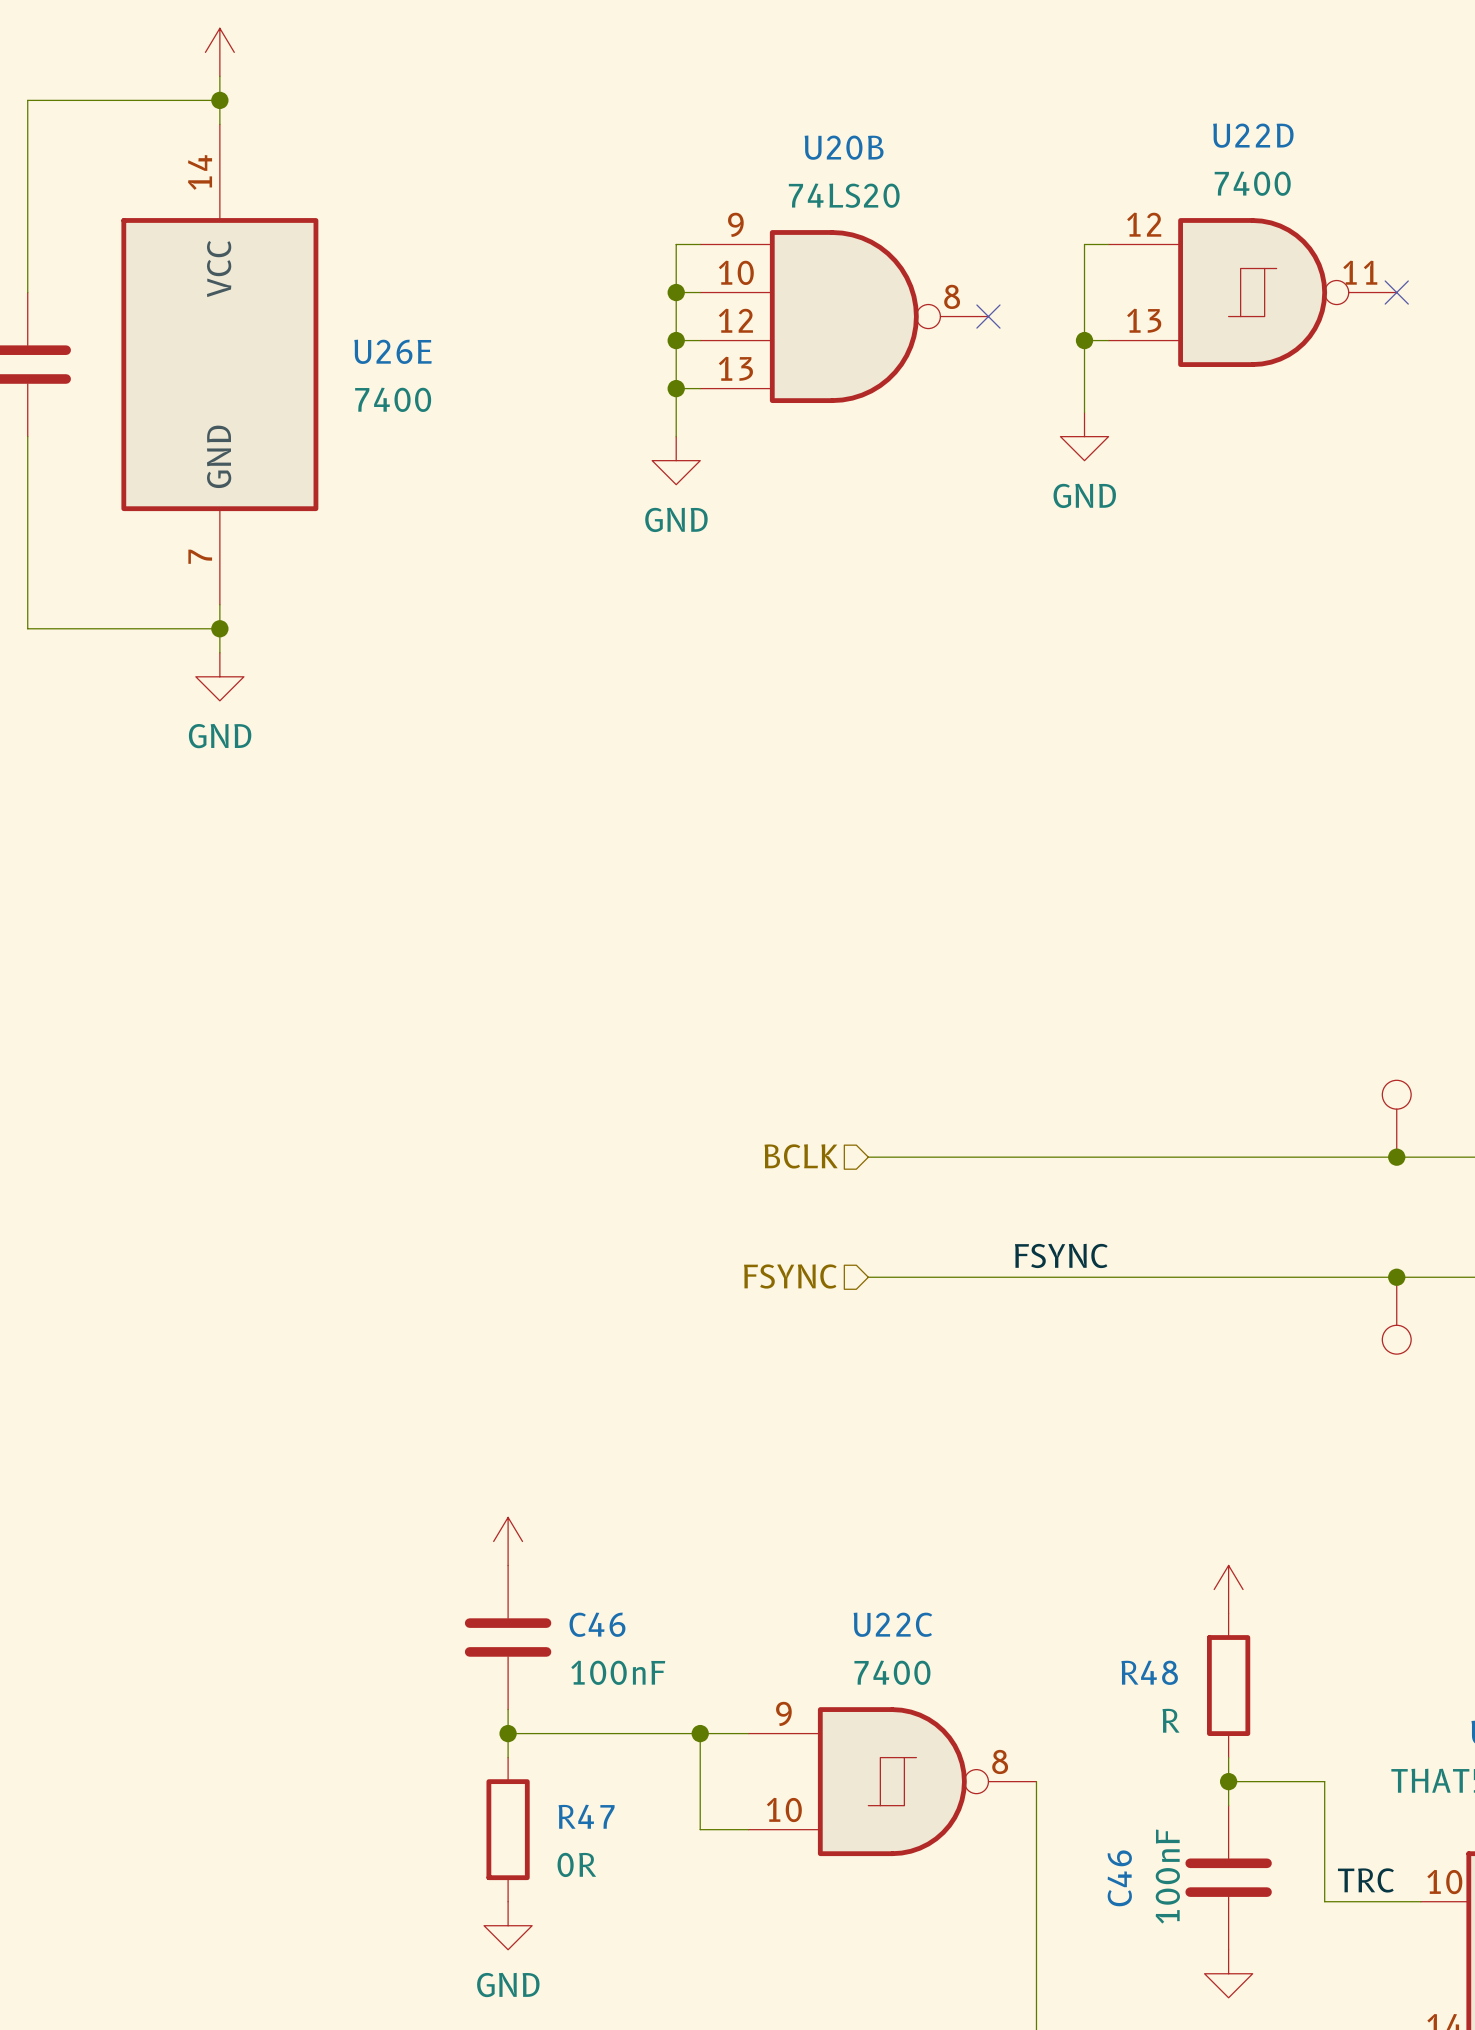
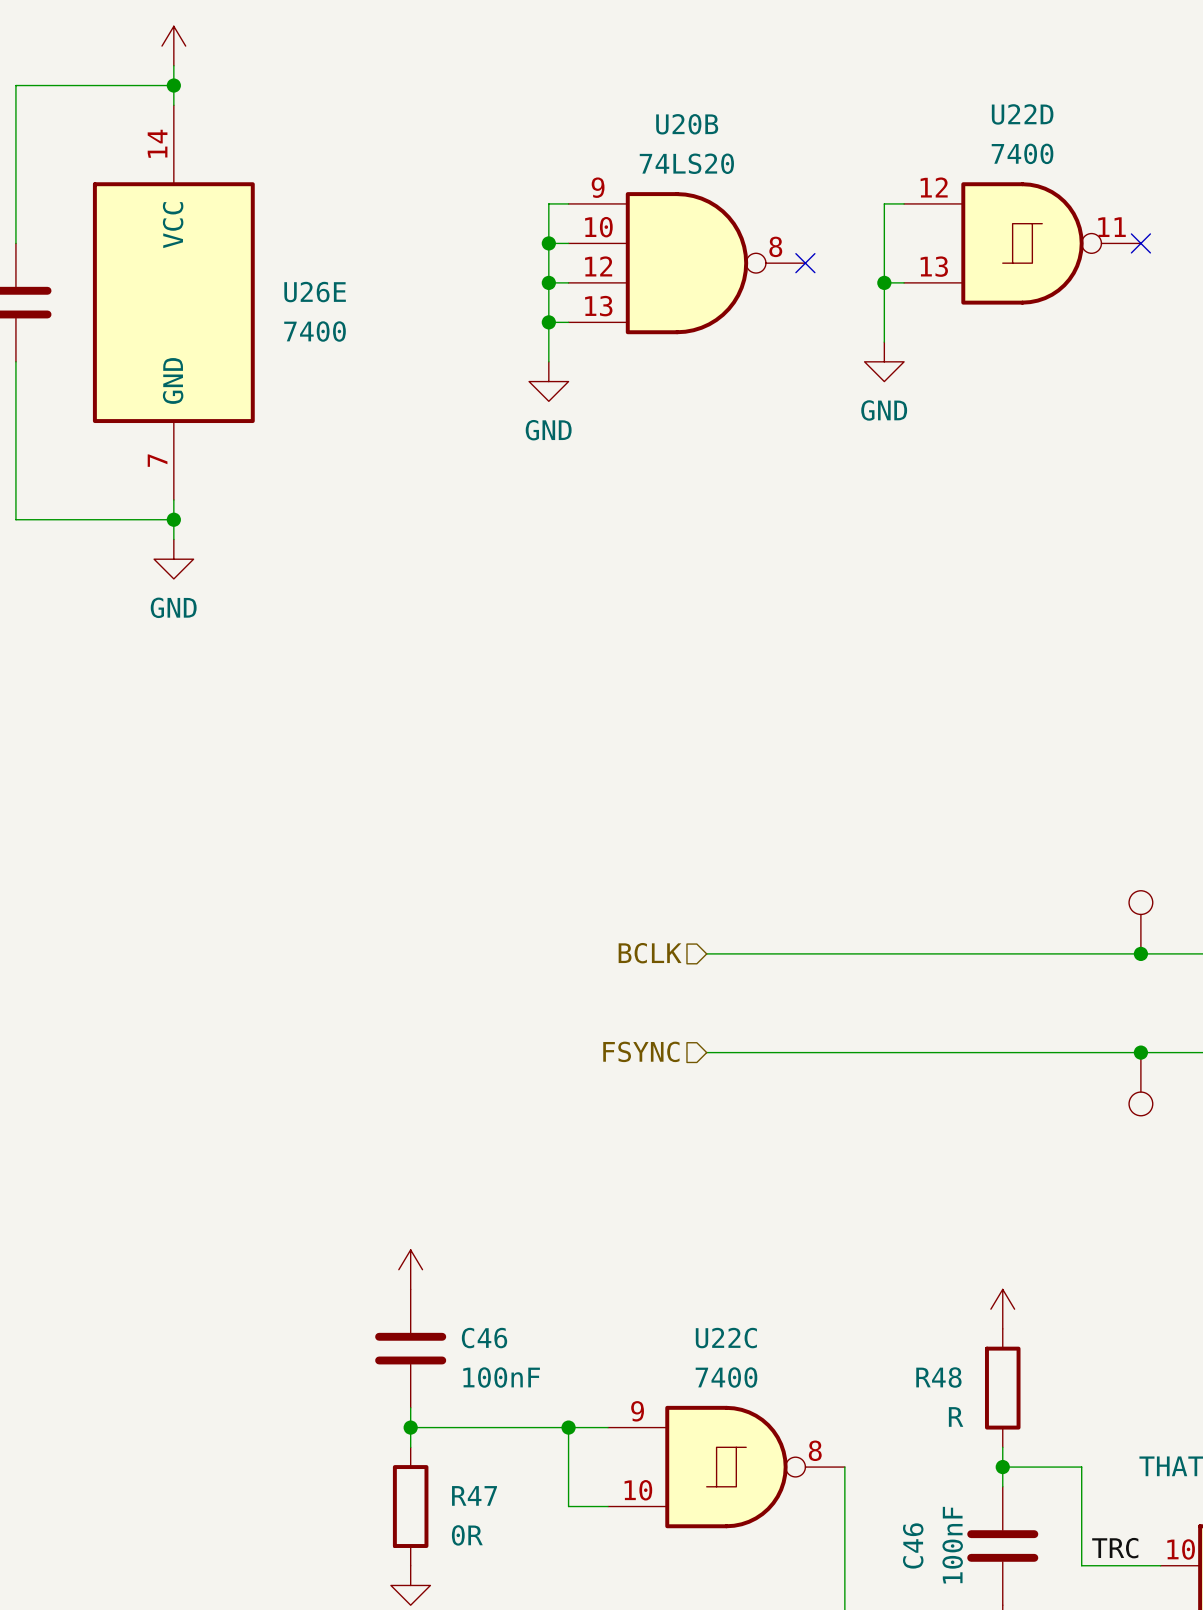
label: FSYNC (1061, 1255) -> none

